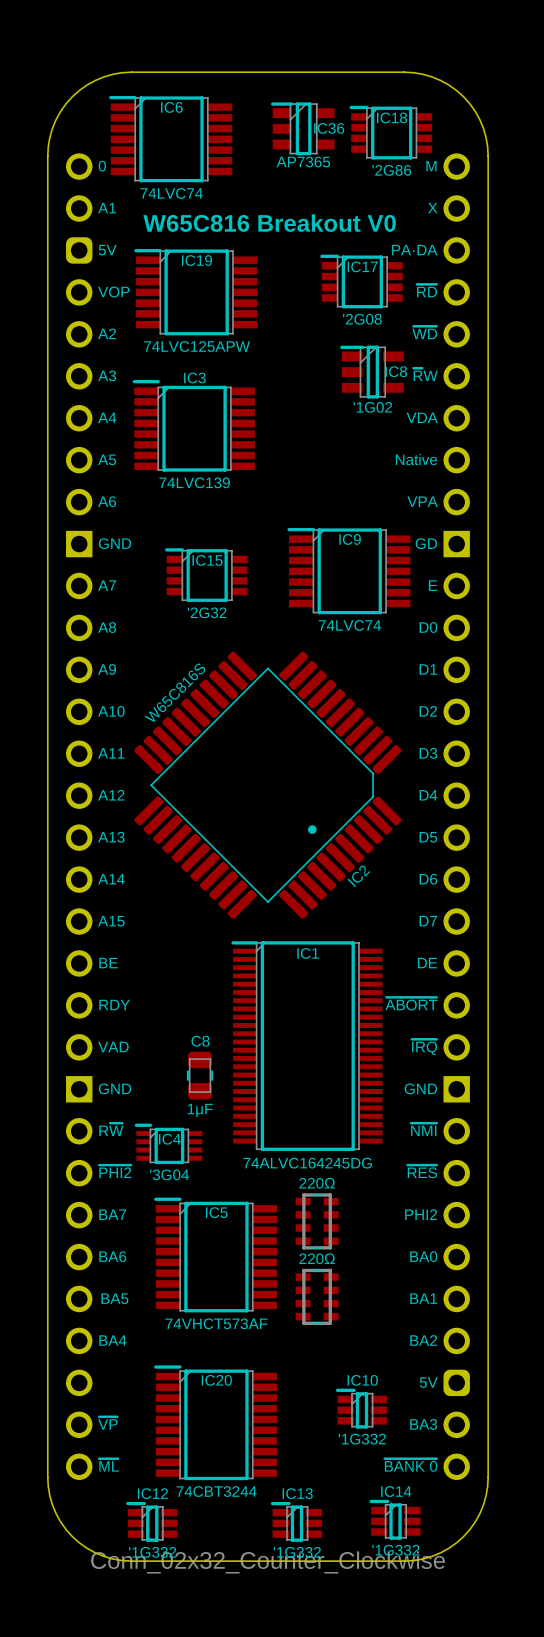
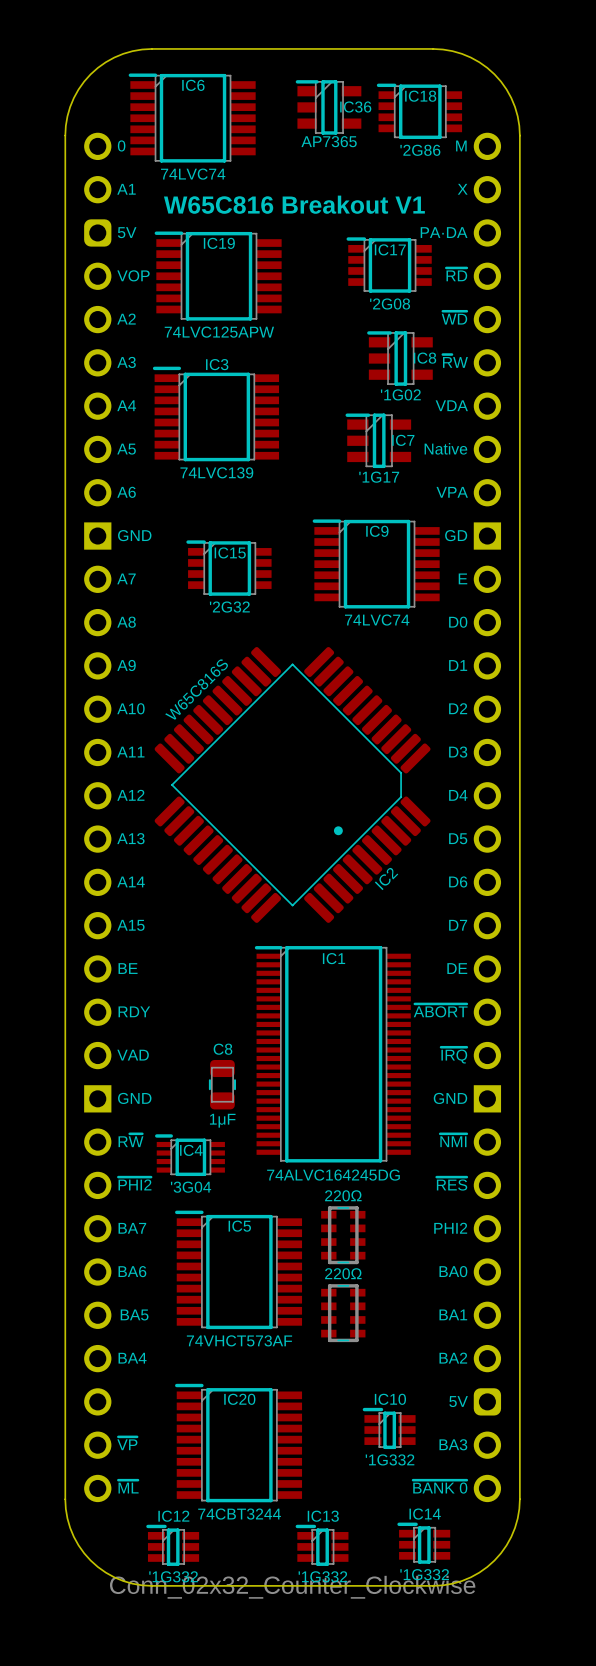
text: W65C816 Breakout V0 (269, 223) -> W65C816 Breakout V1 (294, 204)
IC7: none -> (378, 440)

